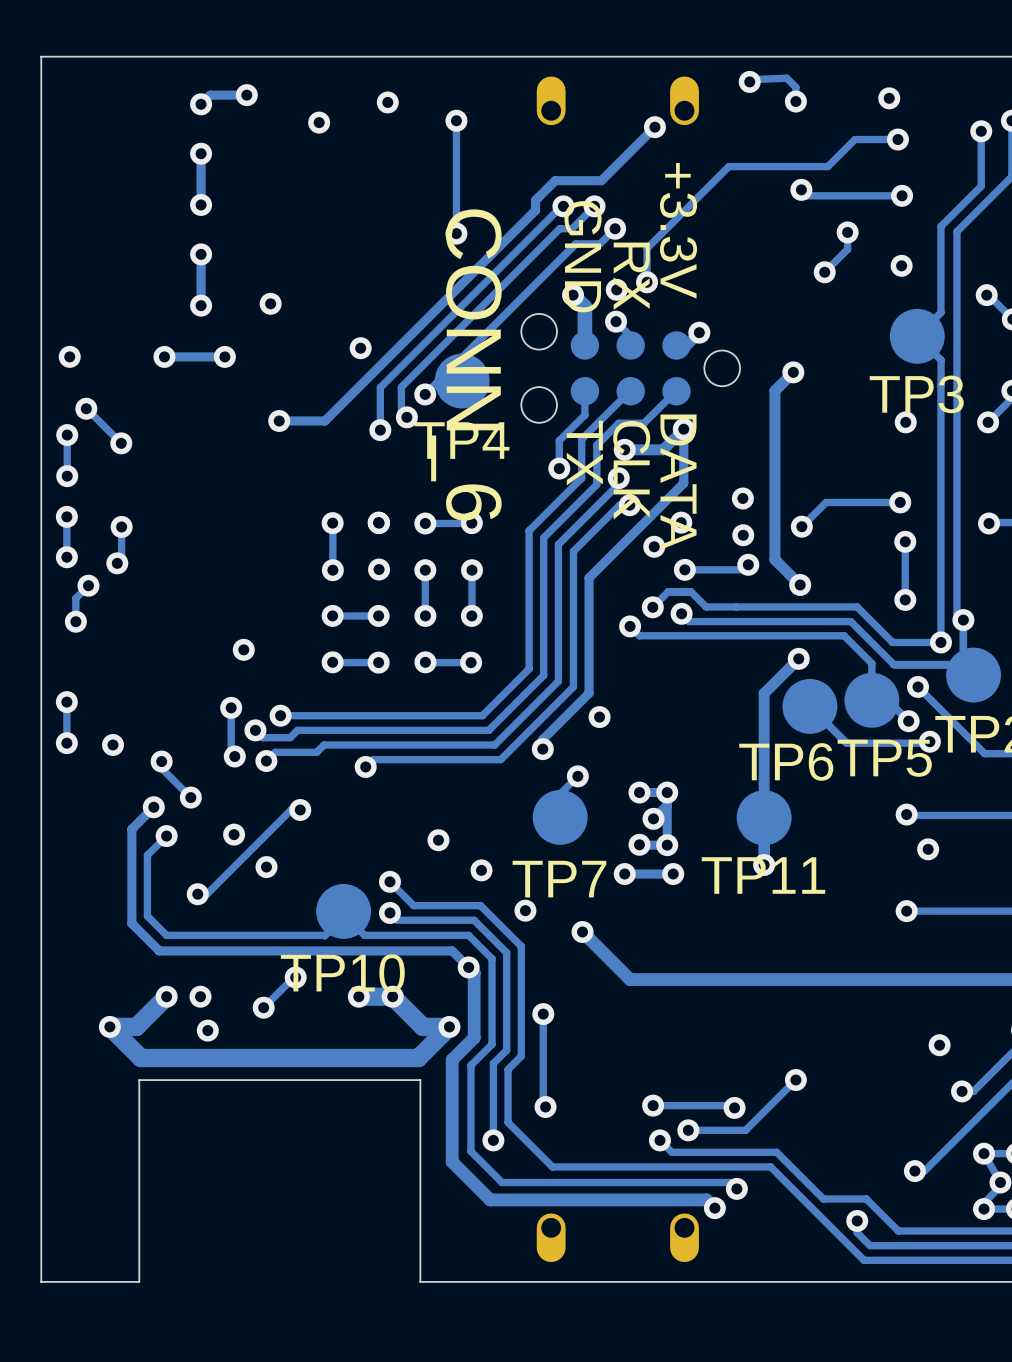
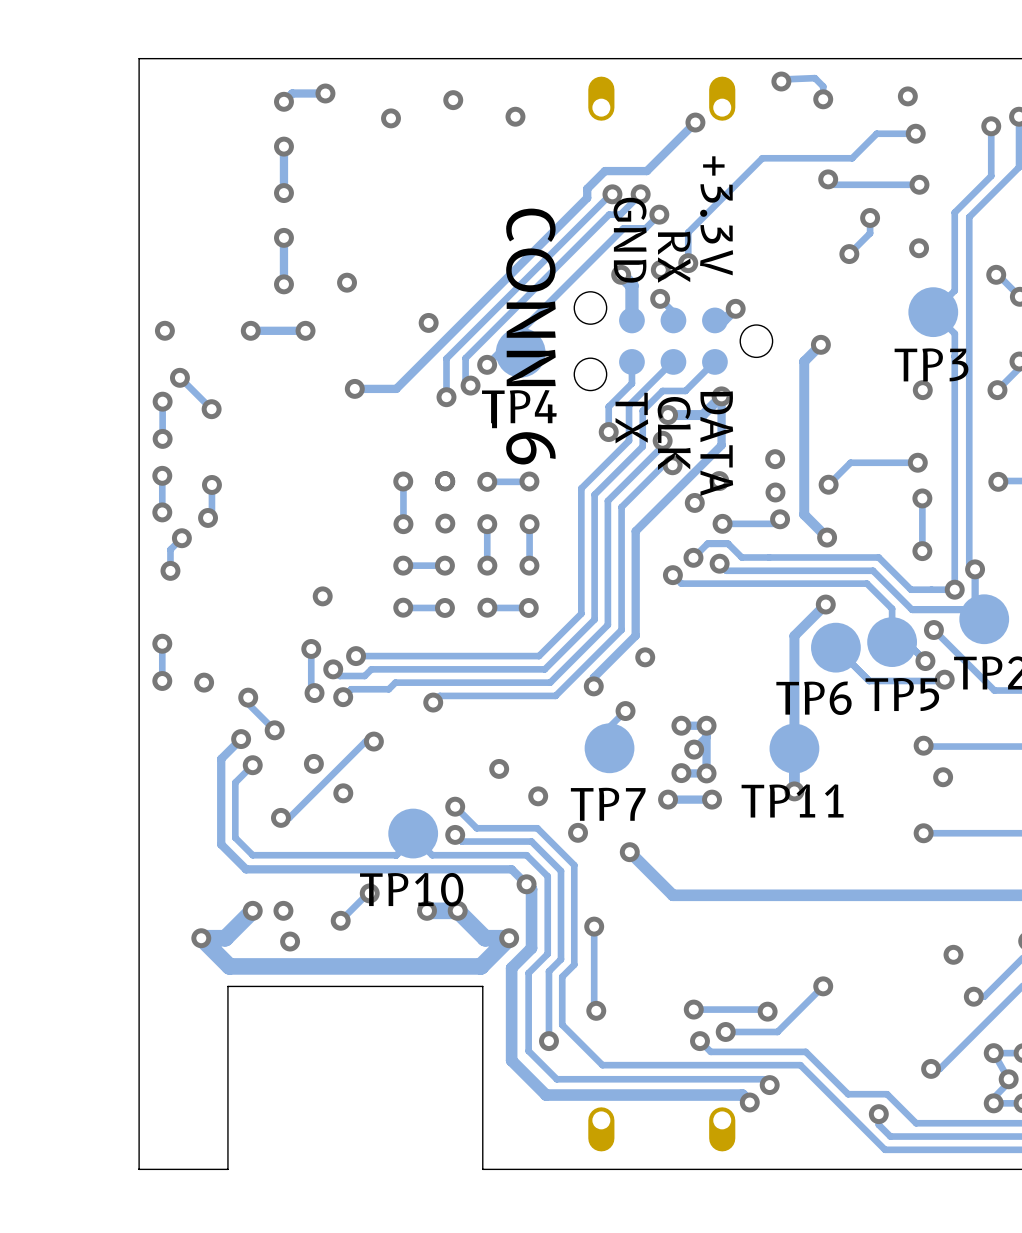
track: (456, 120) (456, 233) -> none
via: (456, 233) -> none

